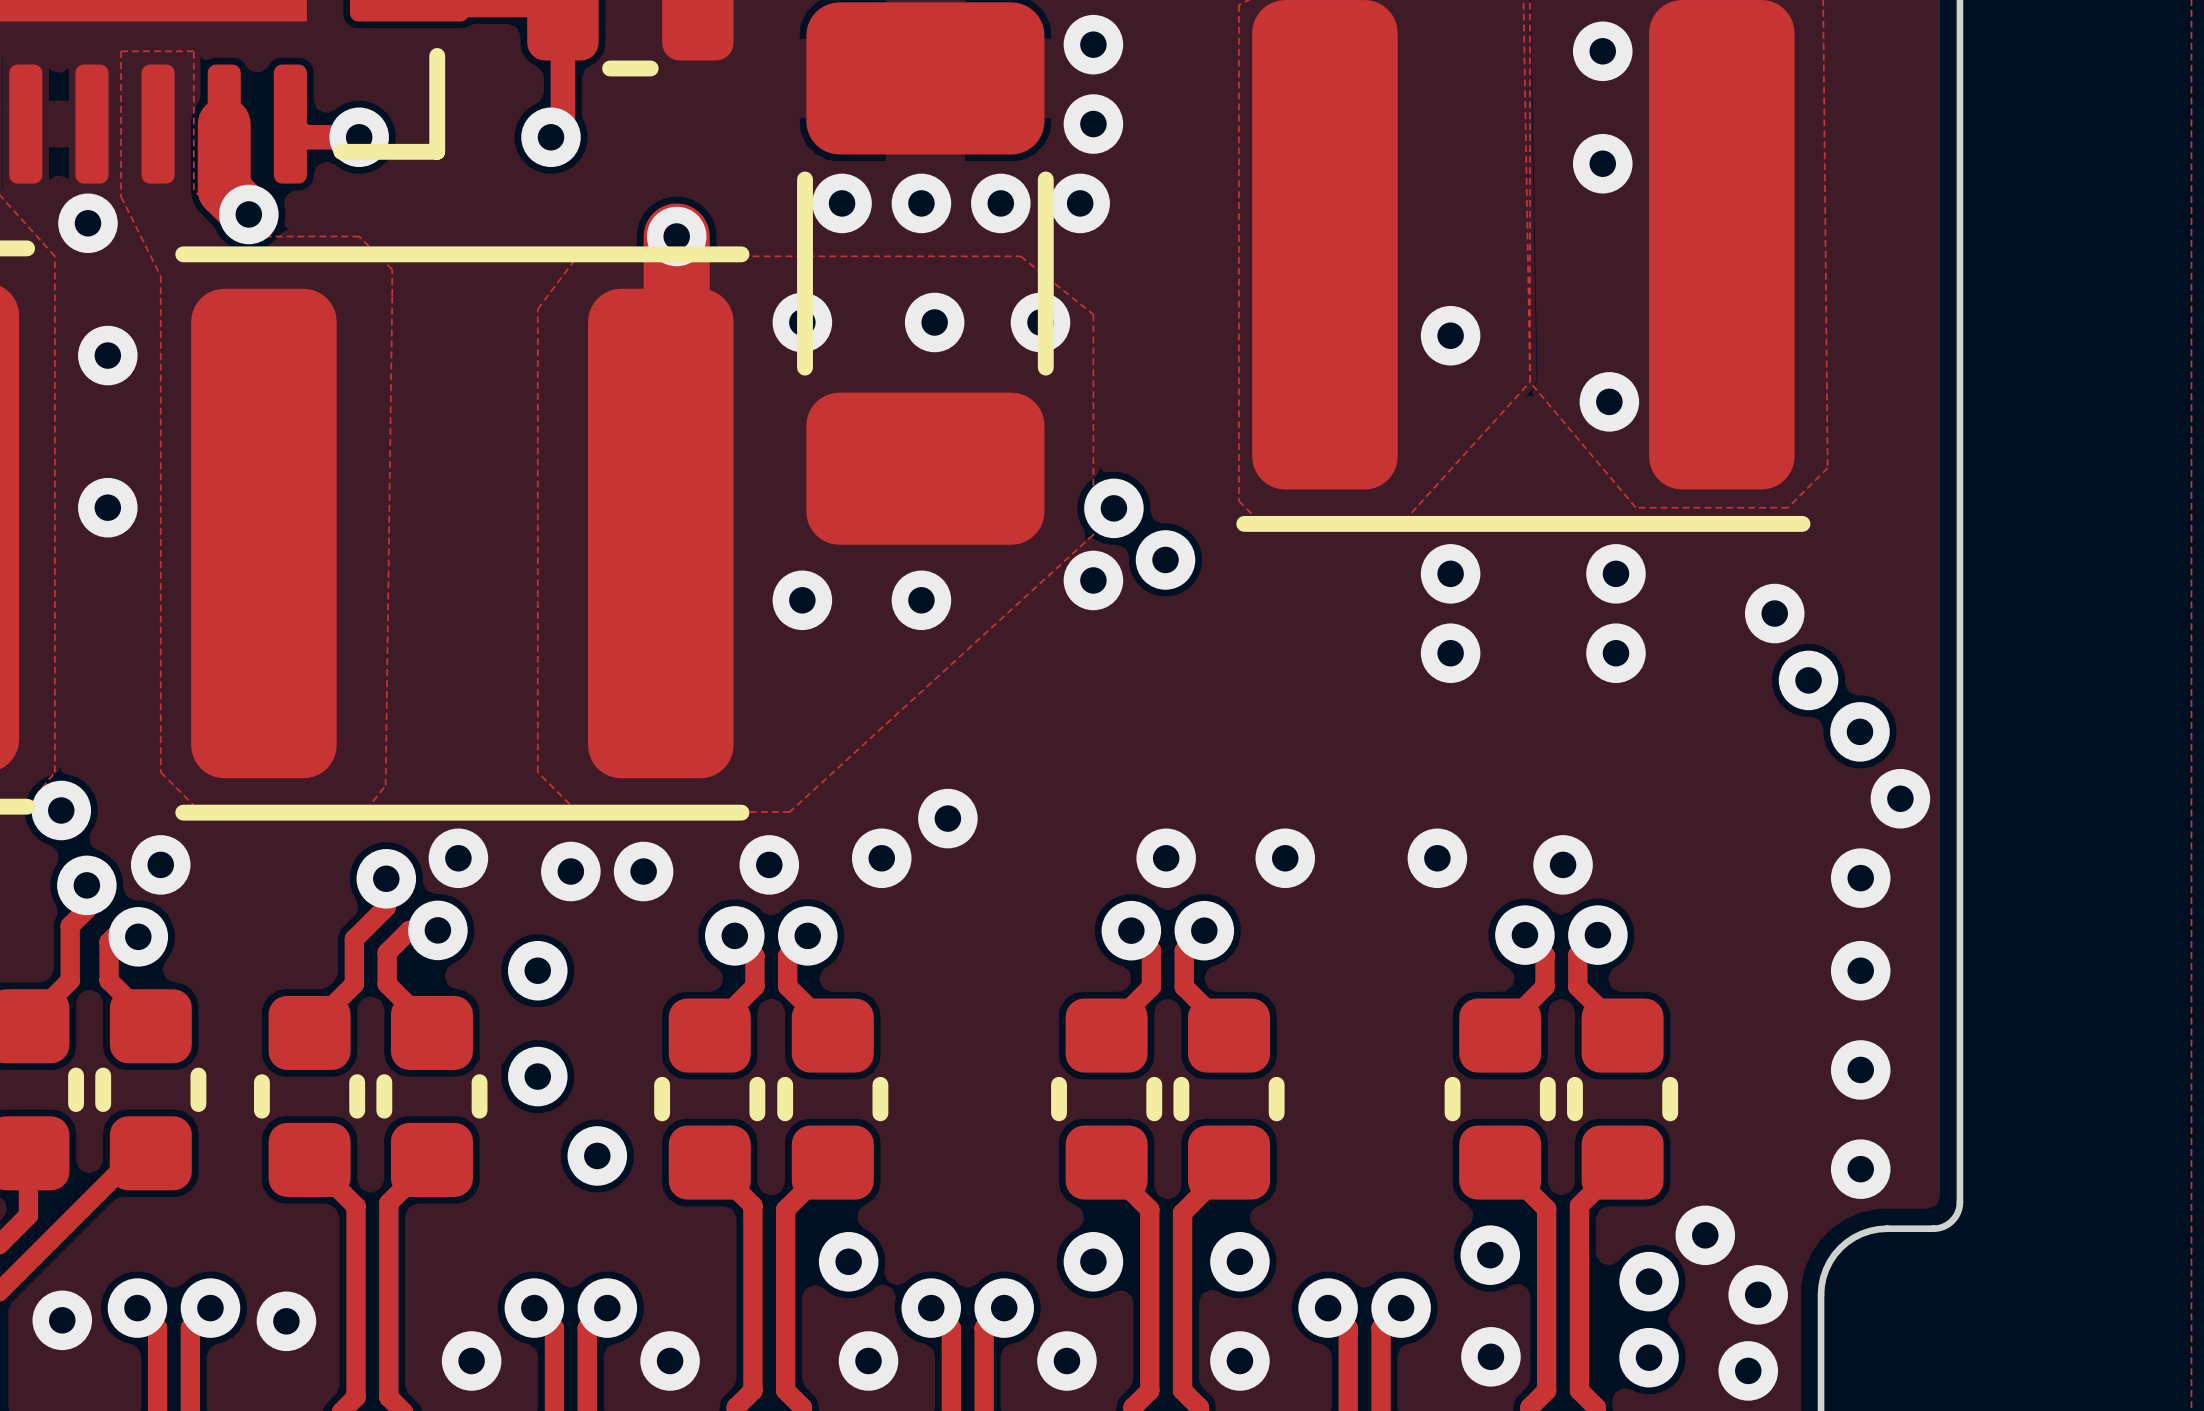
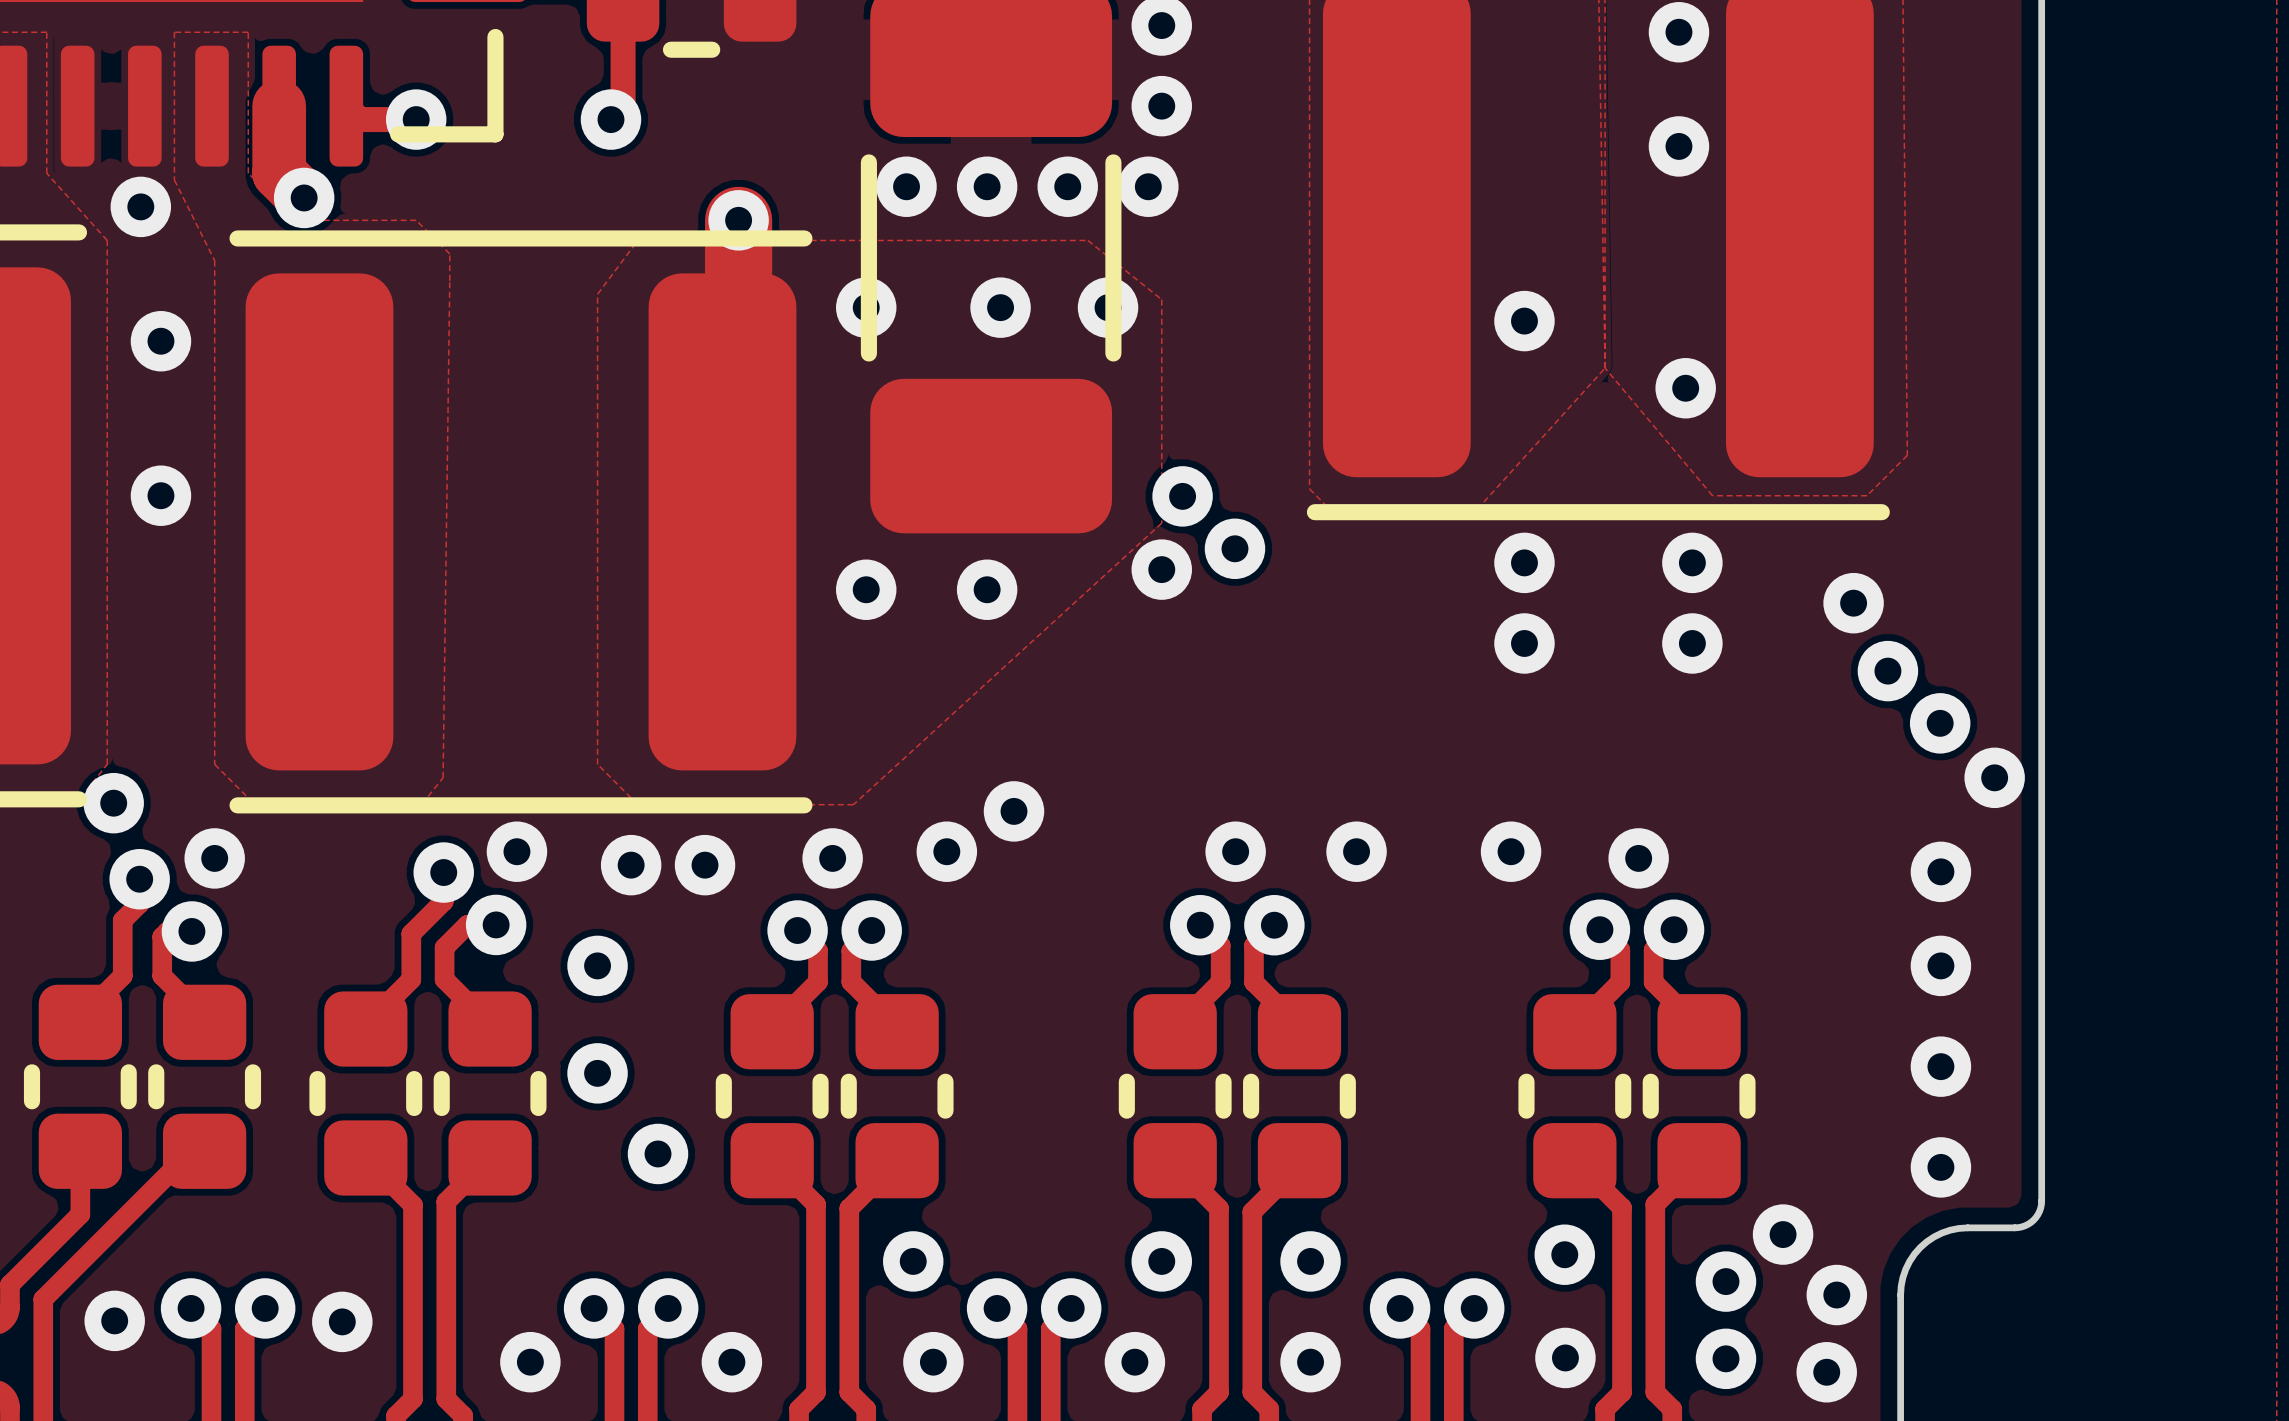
via position: (1900, 798) -> (1994, 777)

